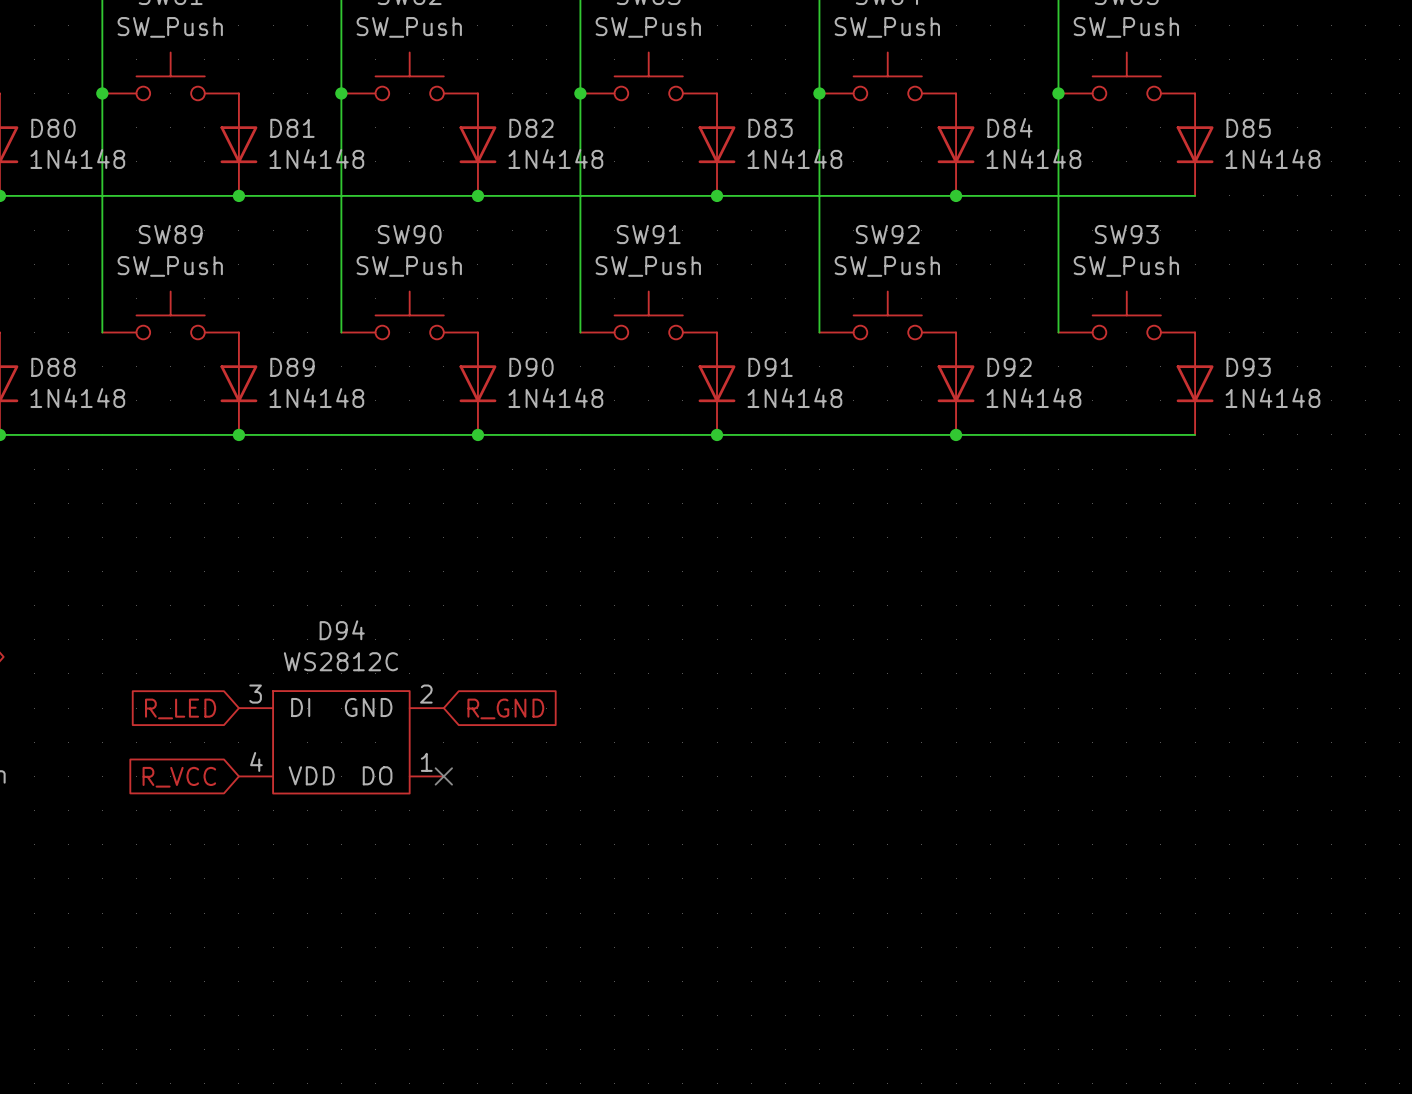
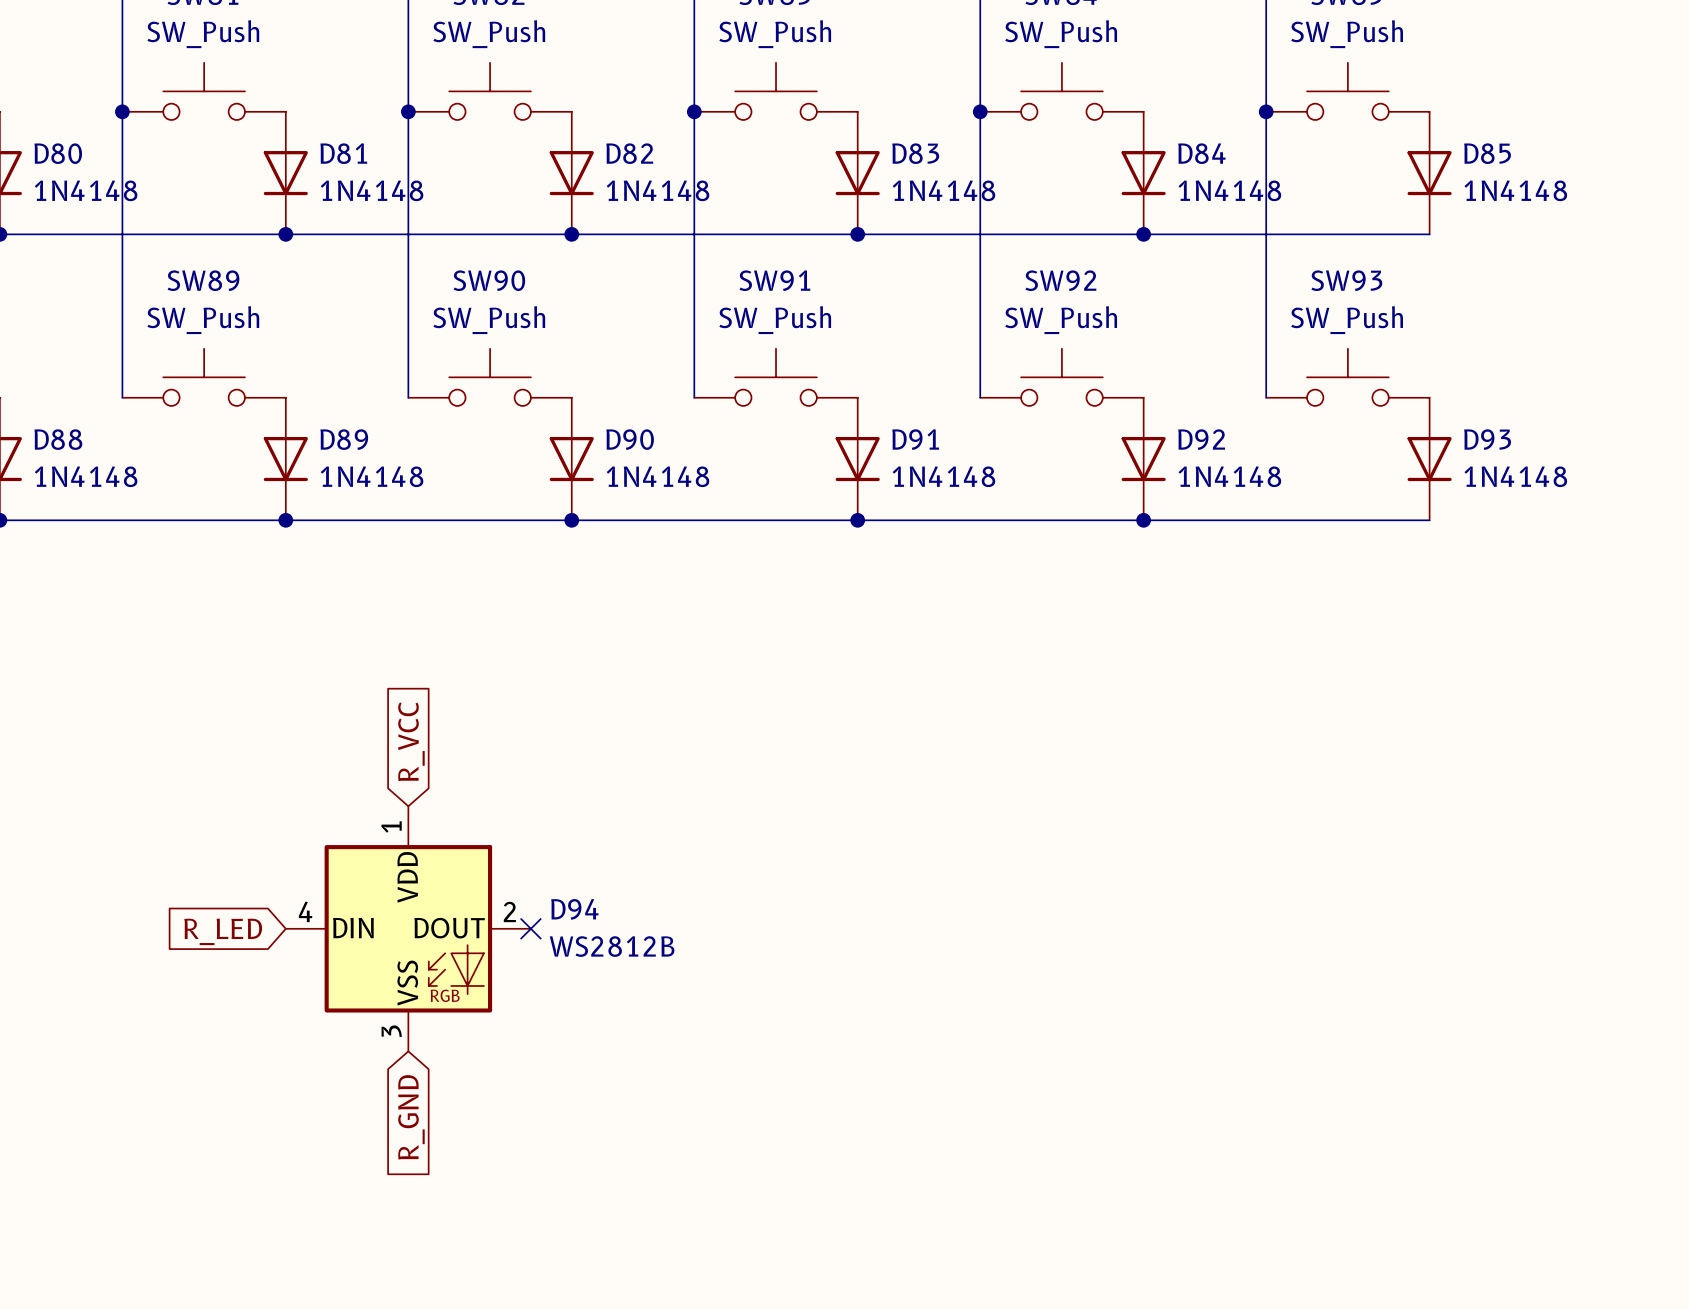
global label: none -> R_VCC (411, 741)
D94 name position: D94 (342, 630) -> D94 (574, 909)
D94 value: WS2812C (340, 661) -> WS2812B (612, 946)
D94 symbol: [238, 691, 444, 794] -> [285, 806, 531, 1052]
global label: R_LED (180, 708) -> none
global label rotation: 0° (505, 708) -> 90° clockwise (411, 1117)
global label position: R_GND (505, 708) -> R_GND (411, 1117)
global label: R_VCC (179, 777) -> R_LED (223, 931)

